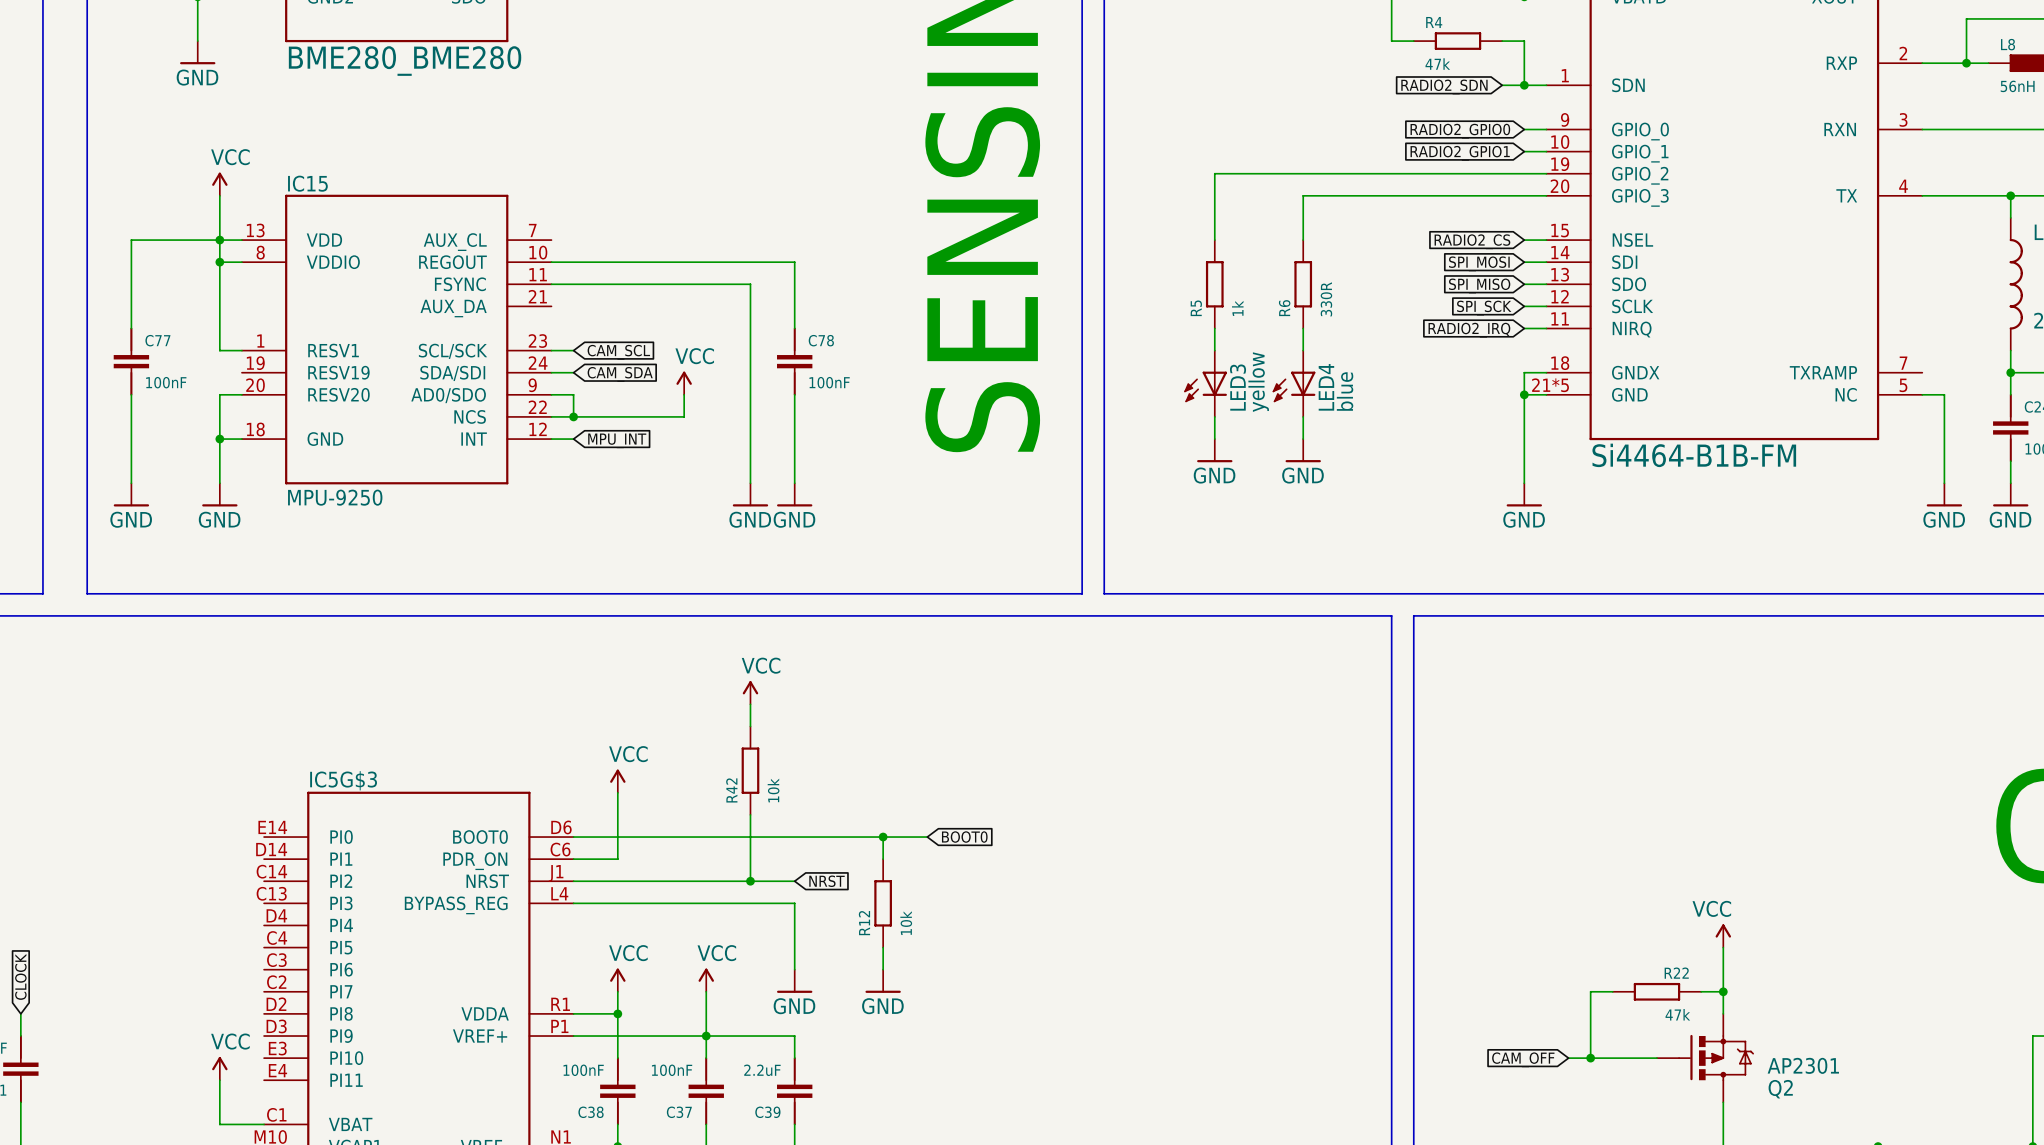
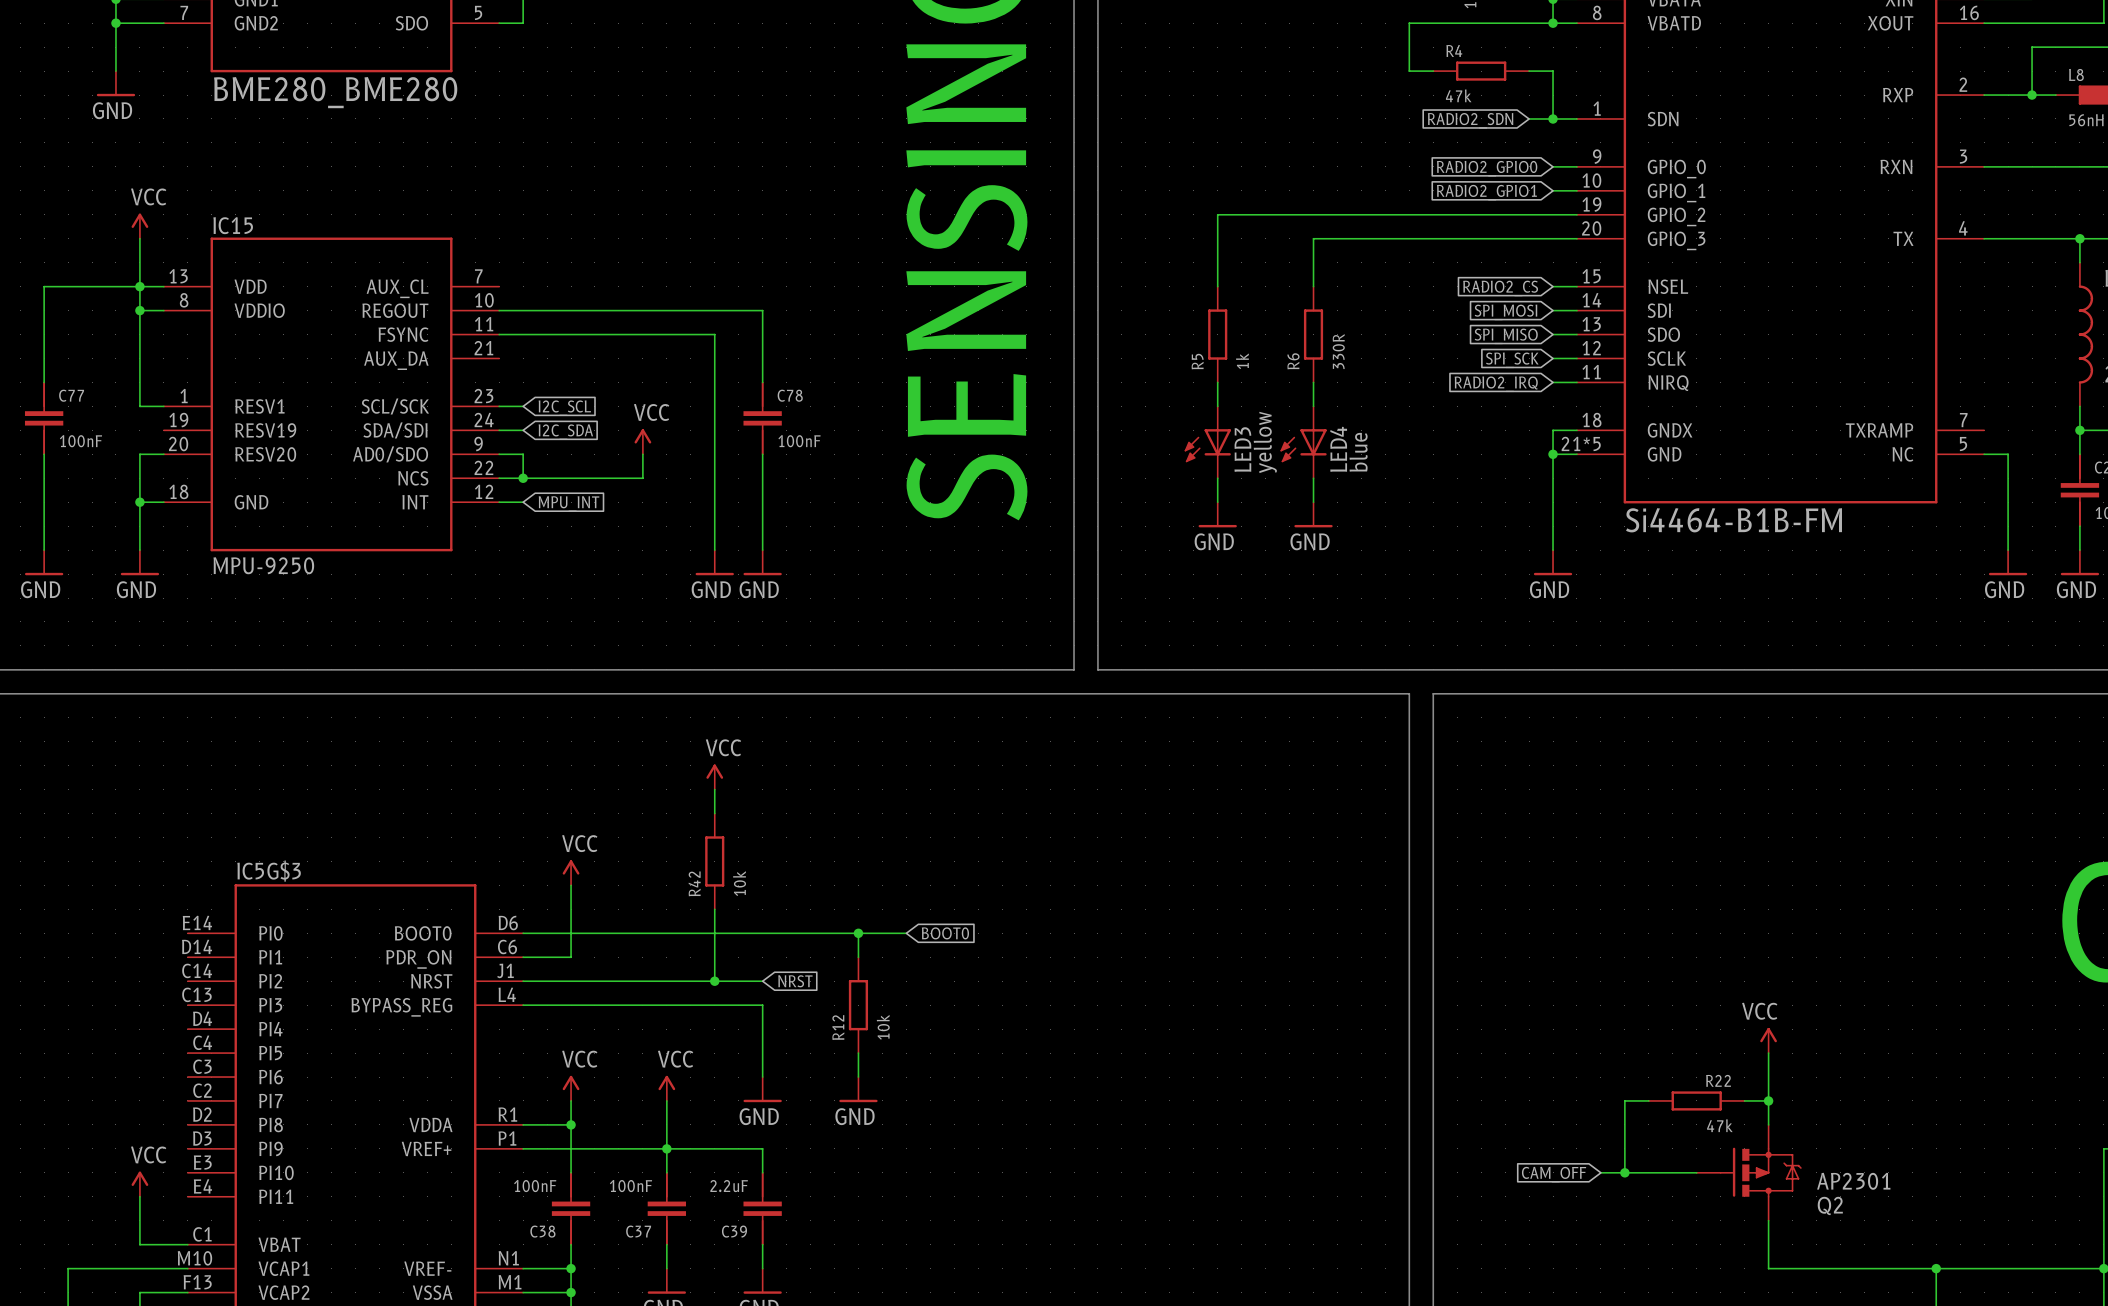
global label: CAM_SCL (618, 352) -> I2C_SCL (564, 408)
global label: CAM_SDA (620, 374) -> I2C_SDA (565, 432)

